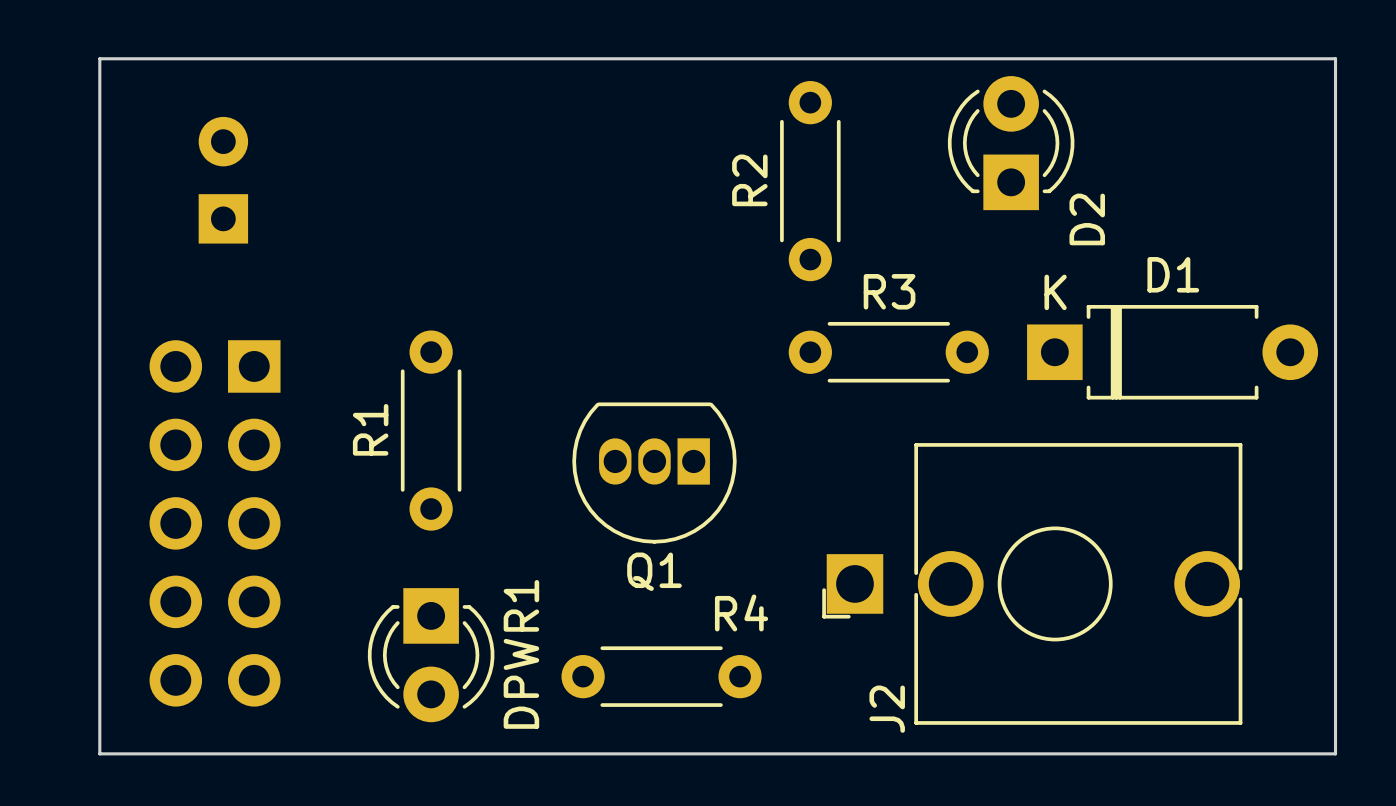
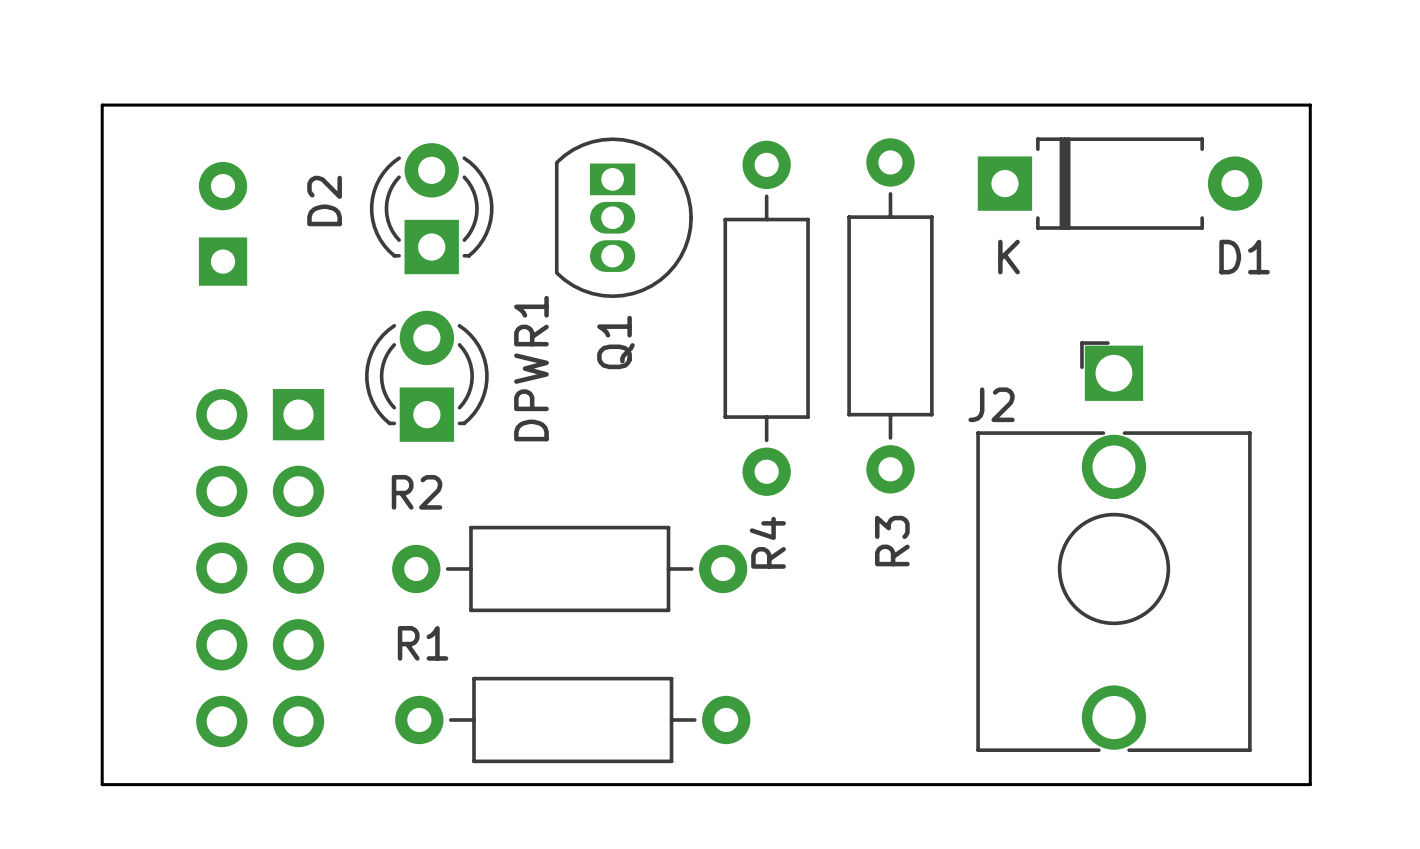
R2 footprint: [780, 81, 841, 282] -> [392, 525, 748, 613]
D2 position: (1011, 143) -> (431, 208)
R2 name position: R2 (749, 180) -> R2 (417, 492)
D2 name position: D2 (1087, 219) -> D2 (324, 201)
D1 name position: D1 (1173, 274) -> D1 (1244, 257)
R3 name position: R3 (889, 291) -> R3 (892, 541)
D1 text position: K (1055, 292) -> K (1008, 257)
R3 footprint: [788, 321, 989, 383] -> [847, 138, 934, 494]
R1 footprint: [400, 330, 462, 531] -> [395, 676, 751, 764]
D1 position: (1172, 352) -> (1120, 183)
R1 name position: R1 (370, 429) -> R1 (423, 643)
Q1 rotation: 0° (654, 473) -> 90° counterclockwise (623, 217)
Q1 position: (654, 473) -> (623, 217)
part position: (215, 523) -> (260, 568)
J2 rotation: 0° (1032, 583) -> 90° clockwise (1113, 546)
DPWR1 footprint: [367, 588, 495, 723] -> [365, 310, 489, 442]
R4 name position: R4 (741, 612) -> R4 (767, 542)
R4 footprint: [561, 646, 762, 707] -> [723, 140, 810, 496]

